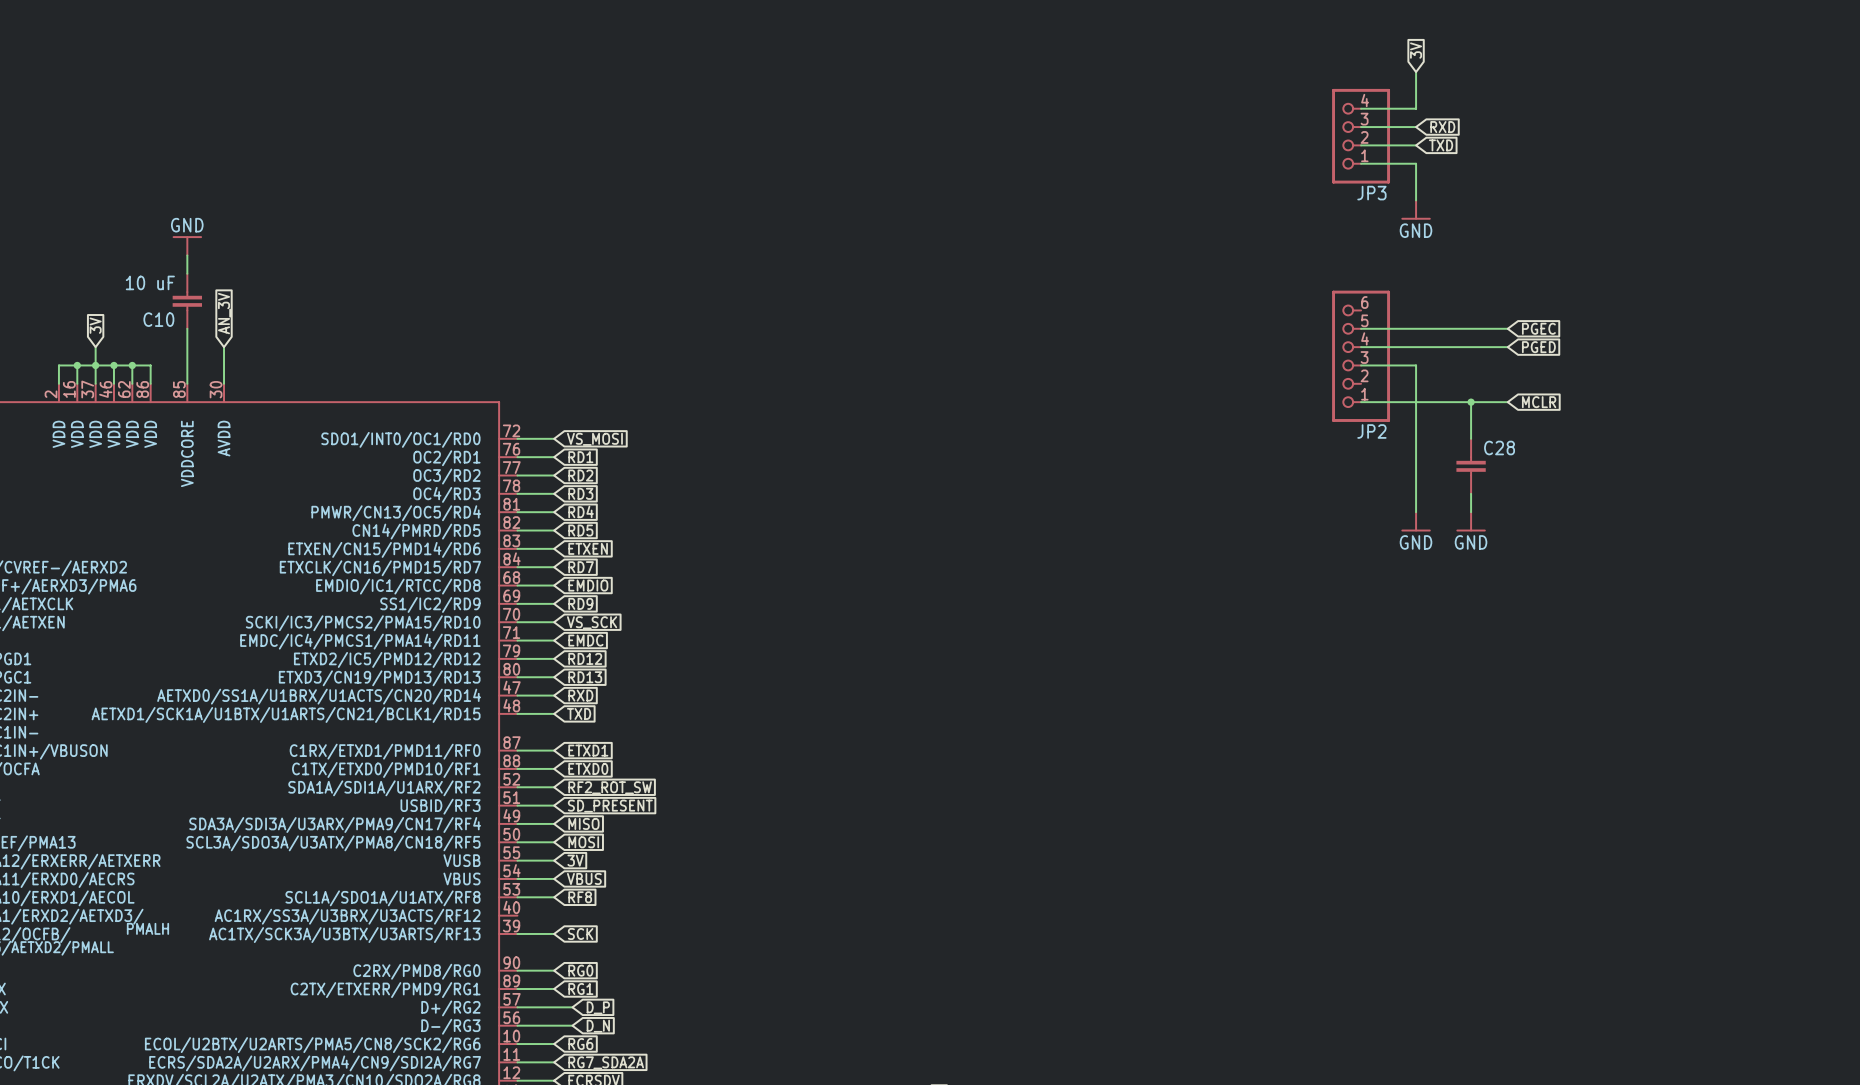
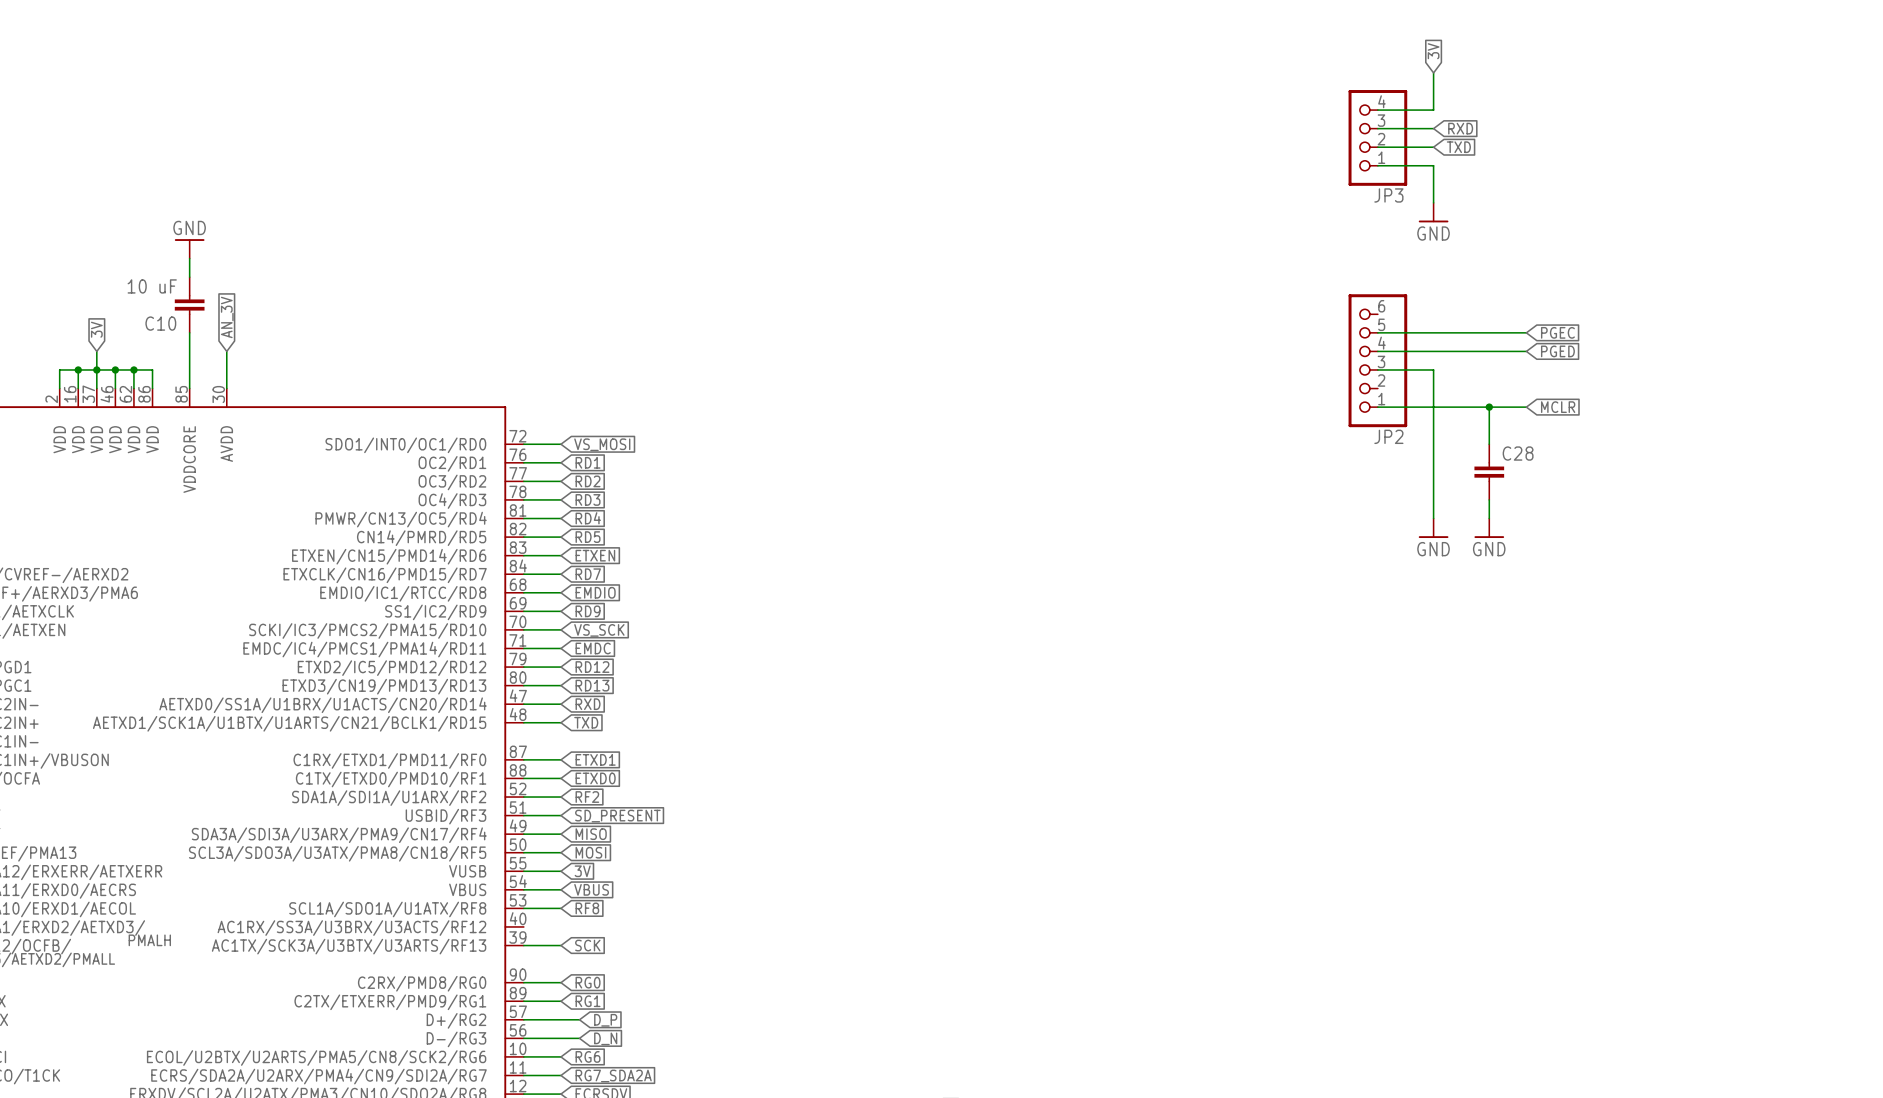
global label: RF2_ROT_SW (610, 787) -> RF2 (587, 797)

